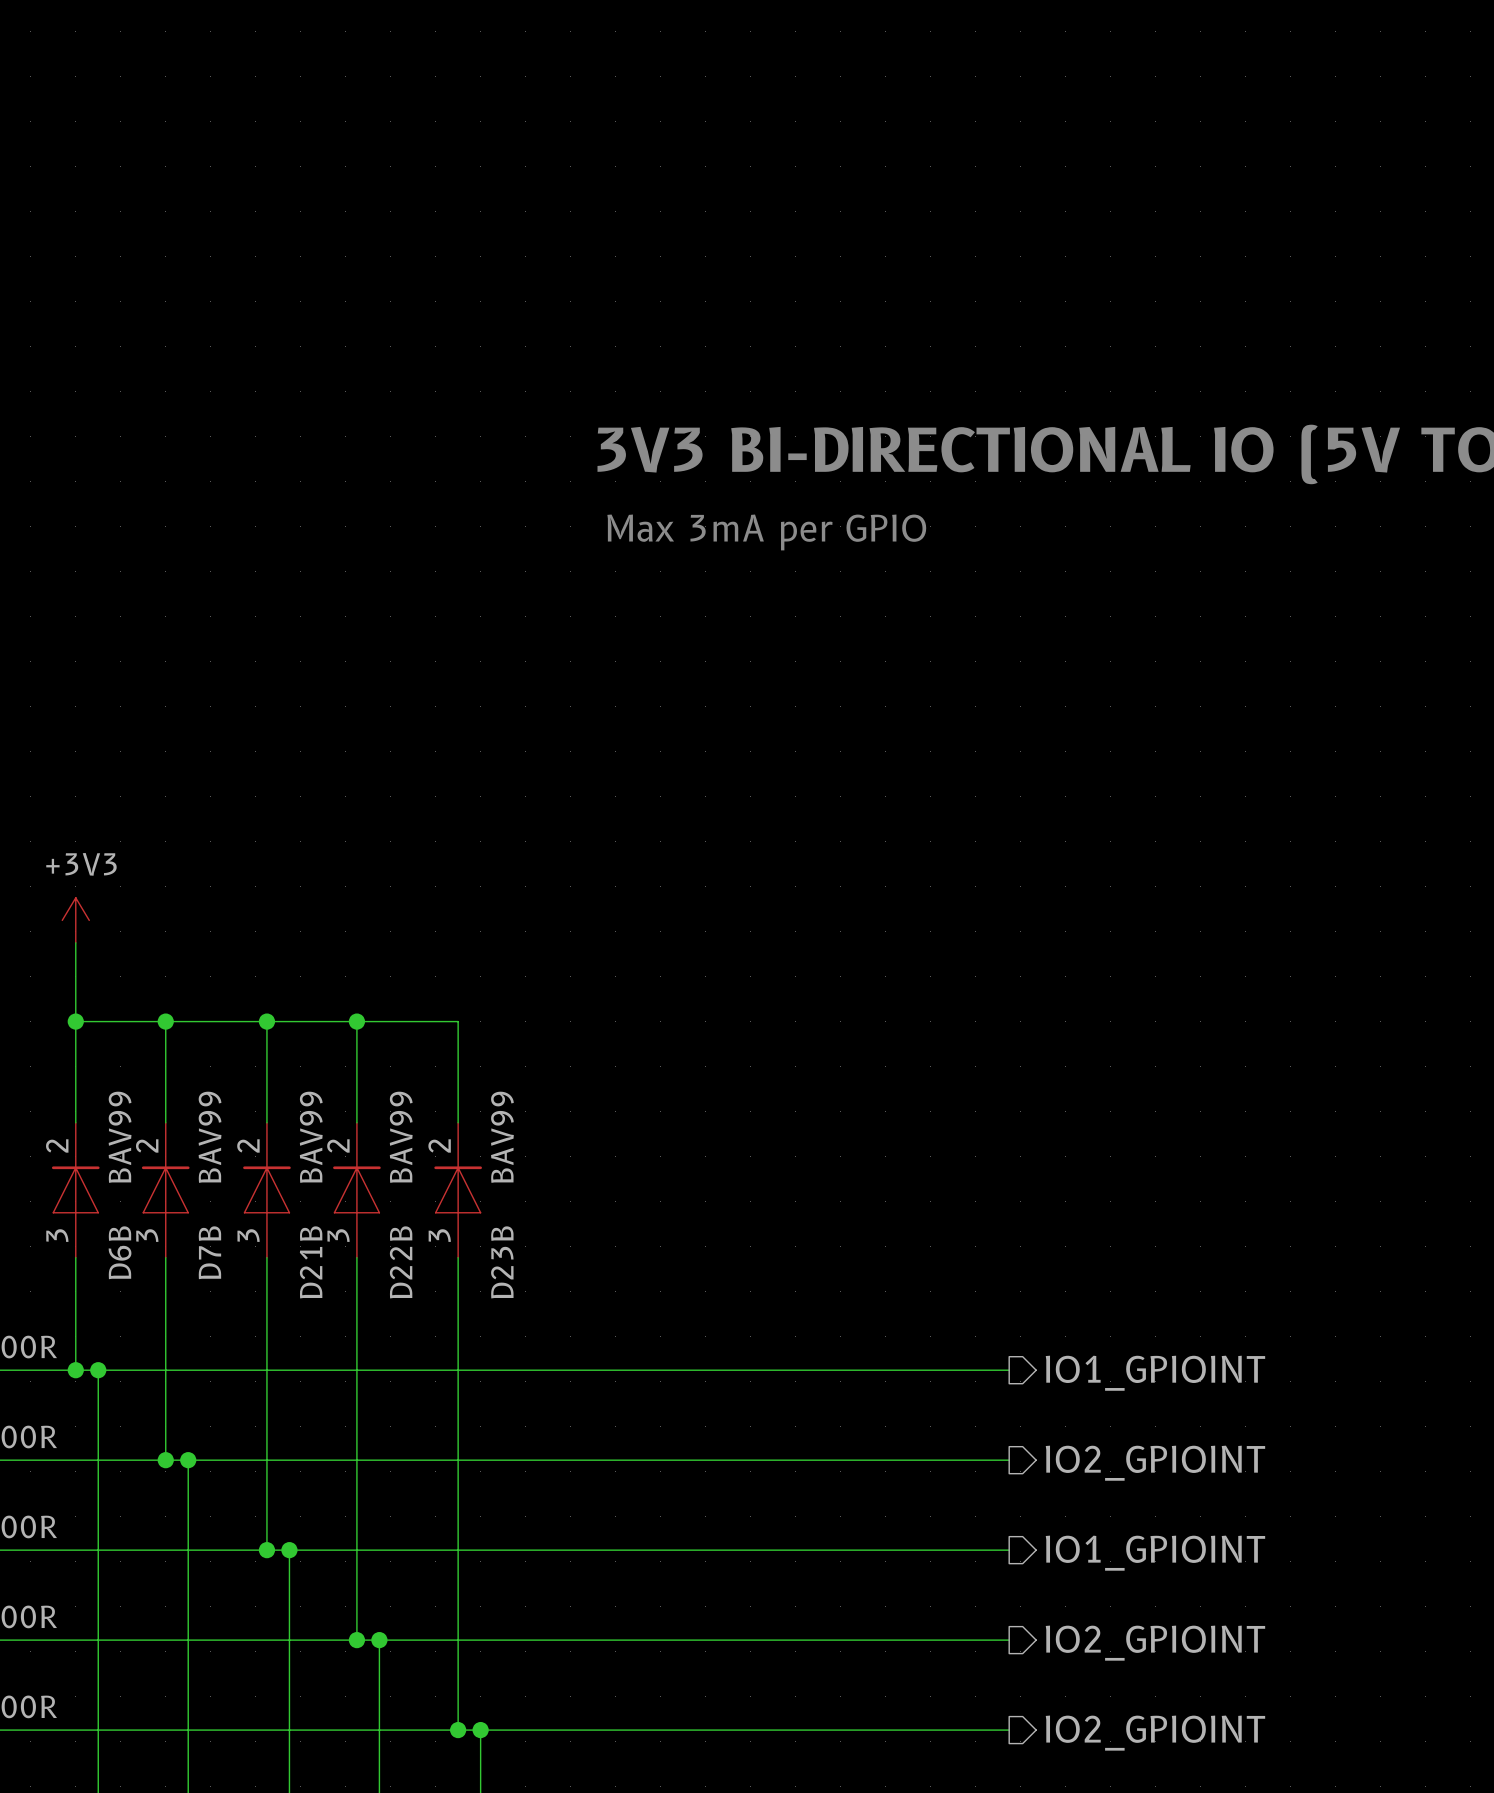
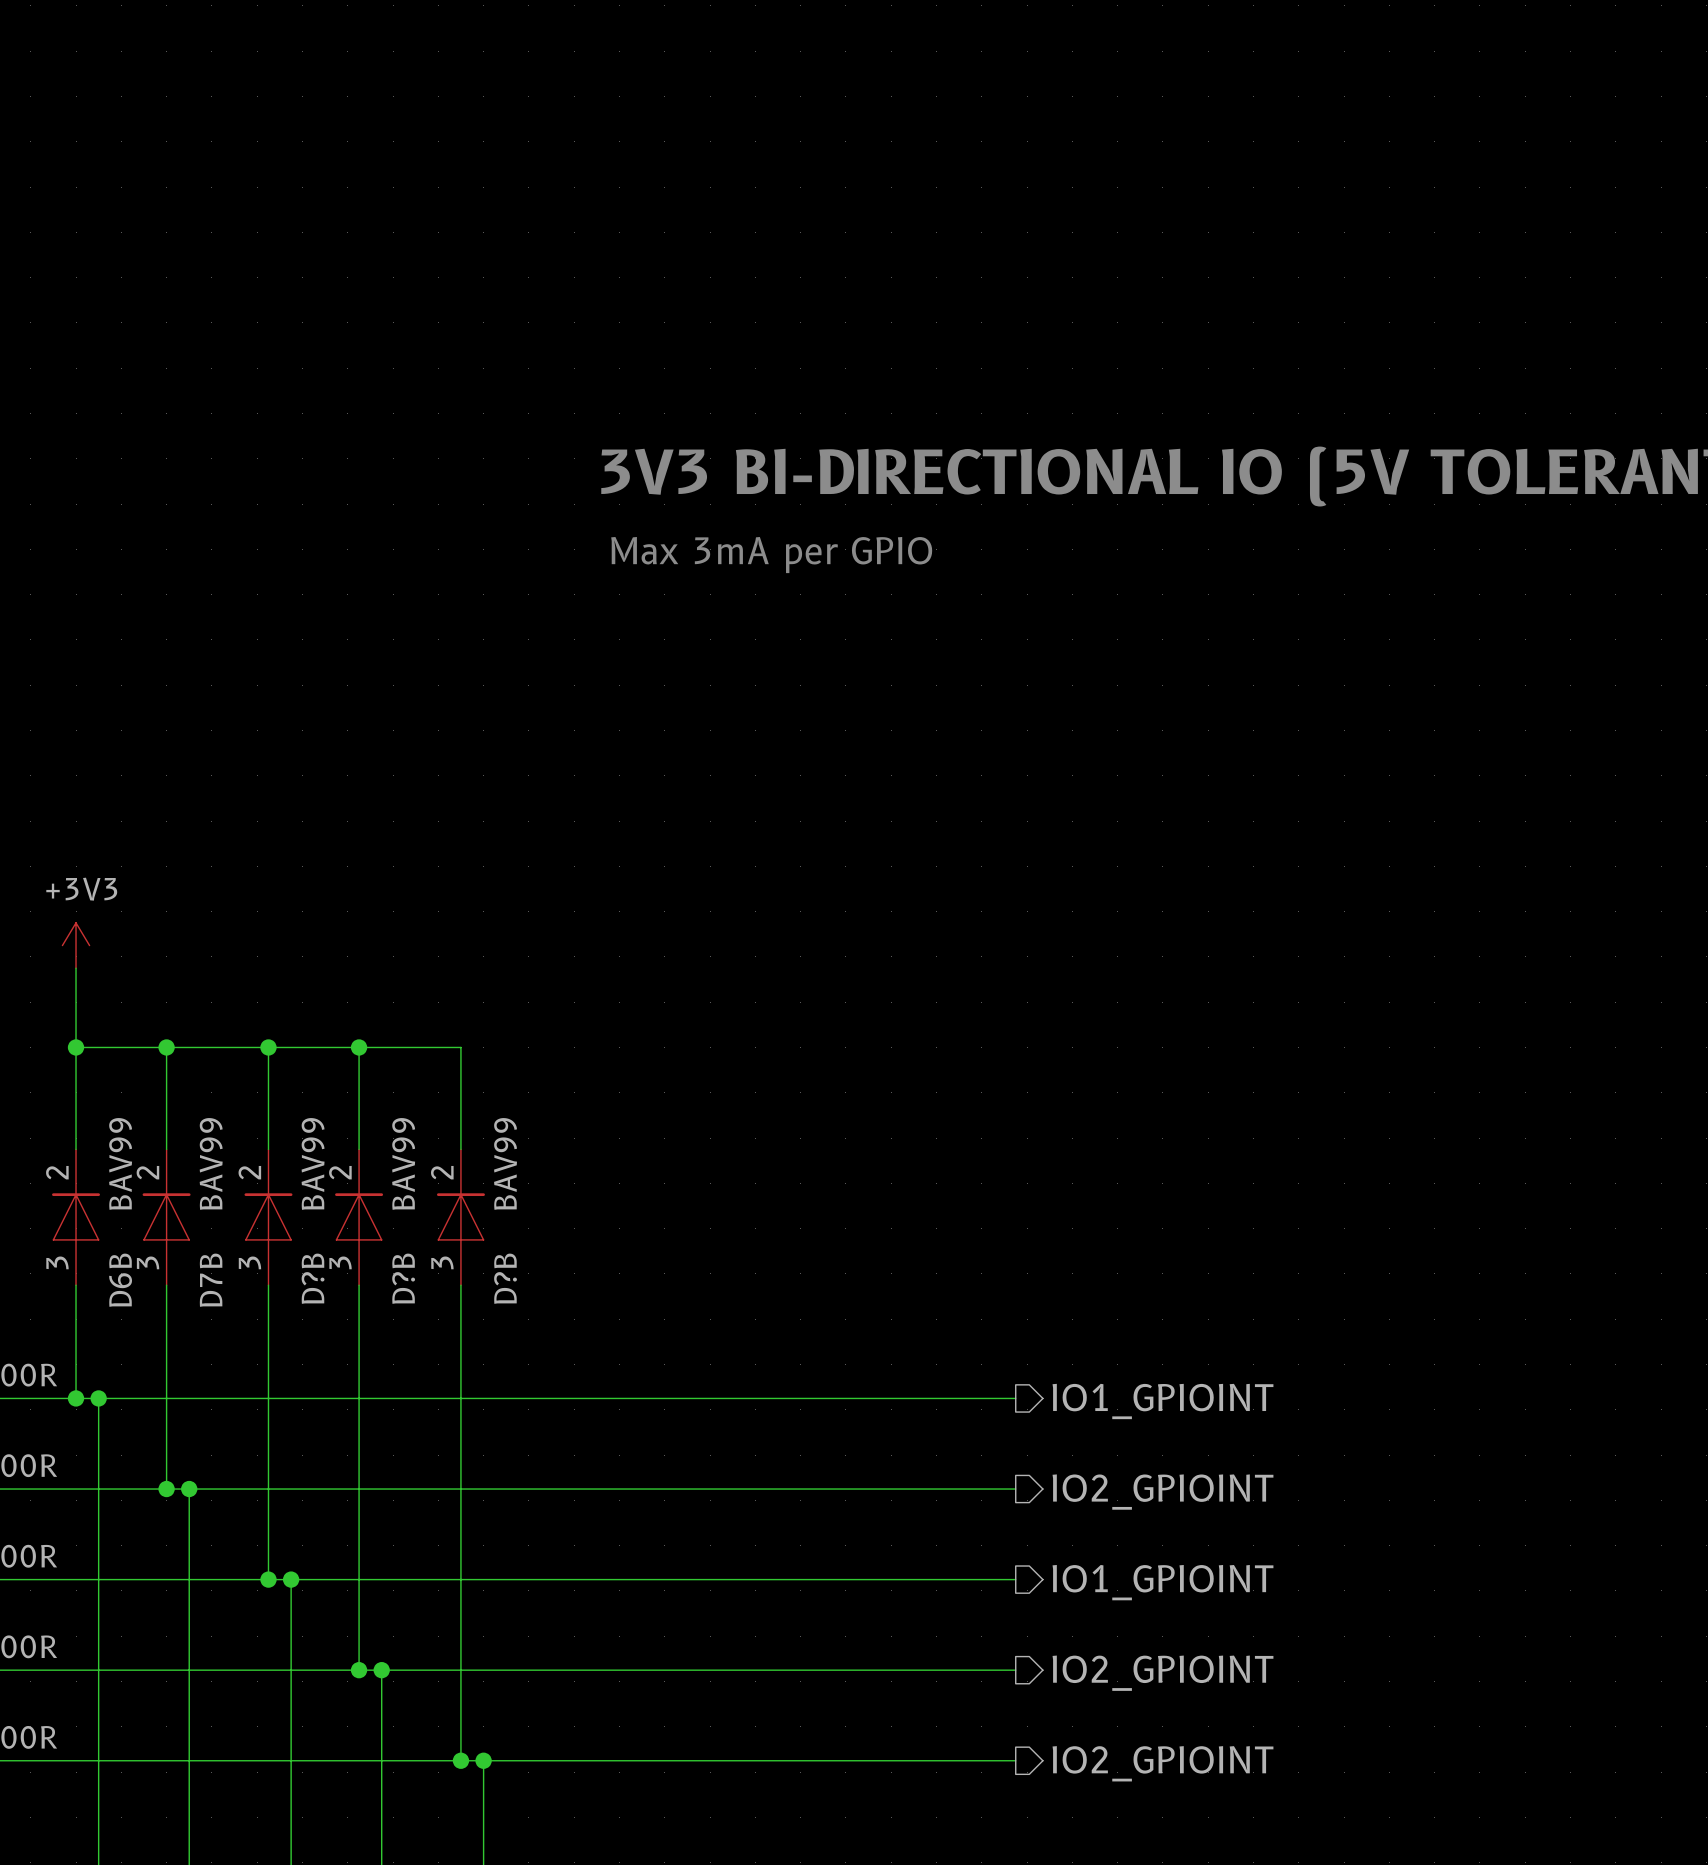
D21B name: D21B (311, 1262) -> D?B (313, 1278)
D22B name: D22B (401, 1262) -> D?B (403, 1278)
D23B name: D23B (502, 1262) -> D?B (505, 1278)

